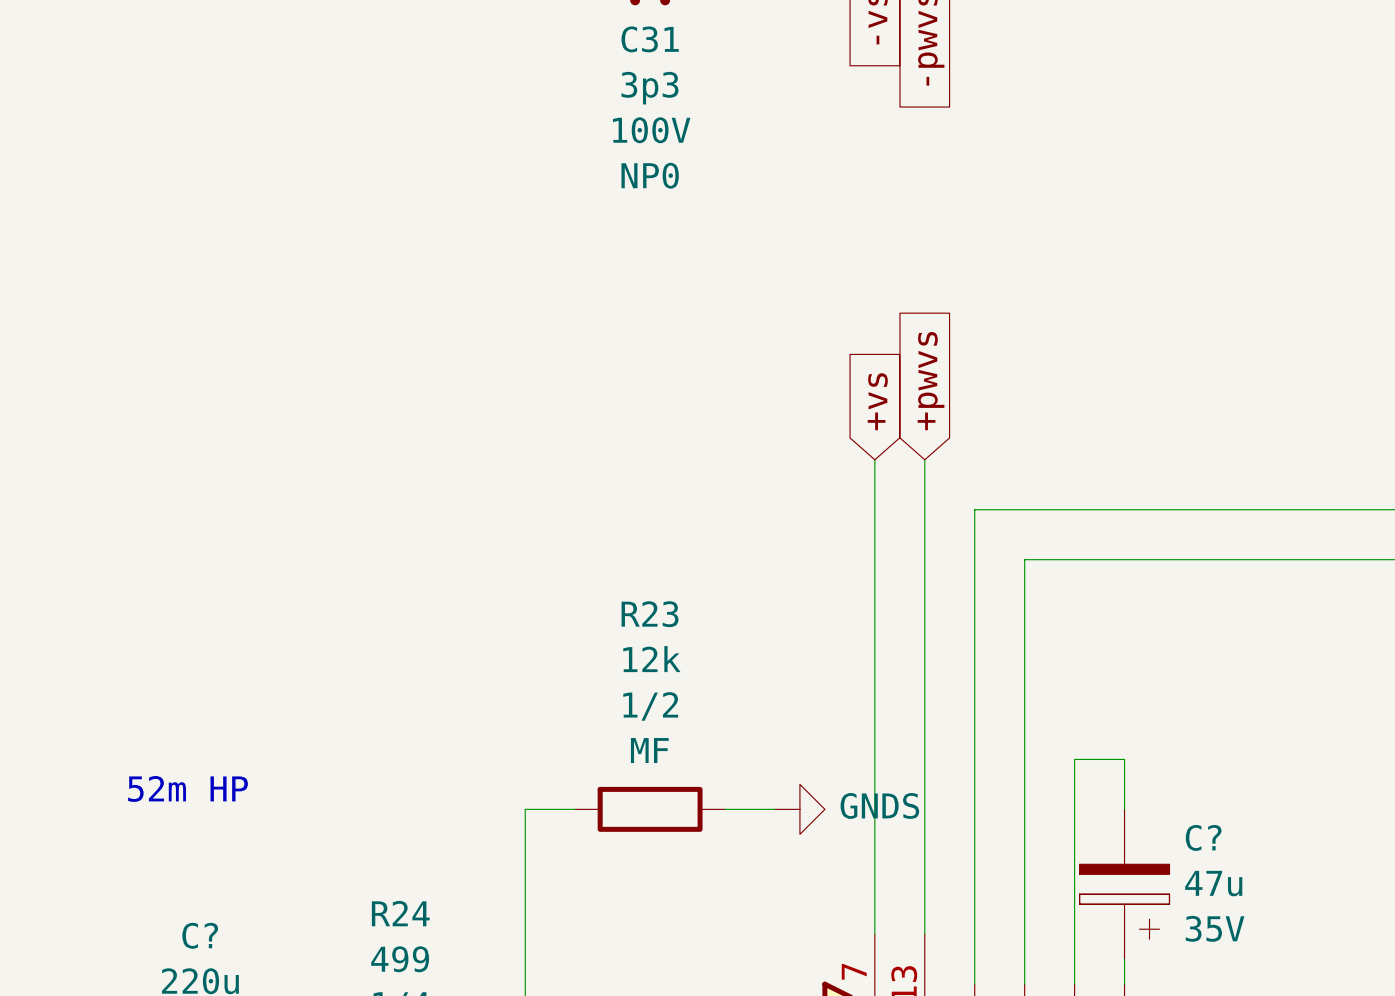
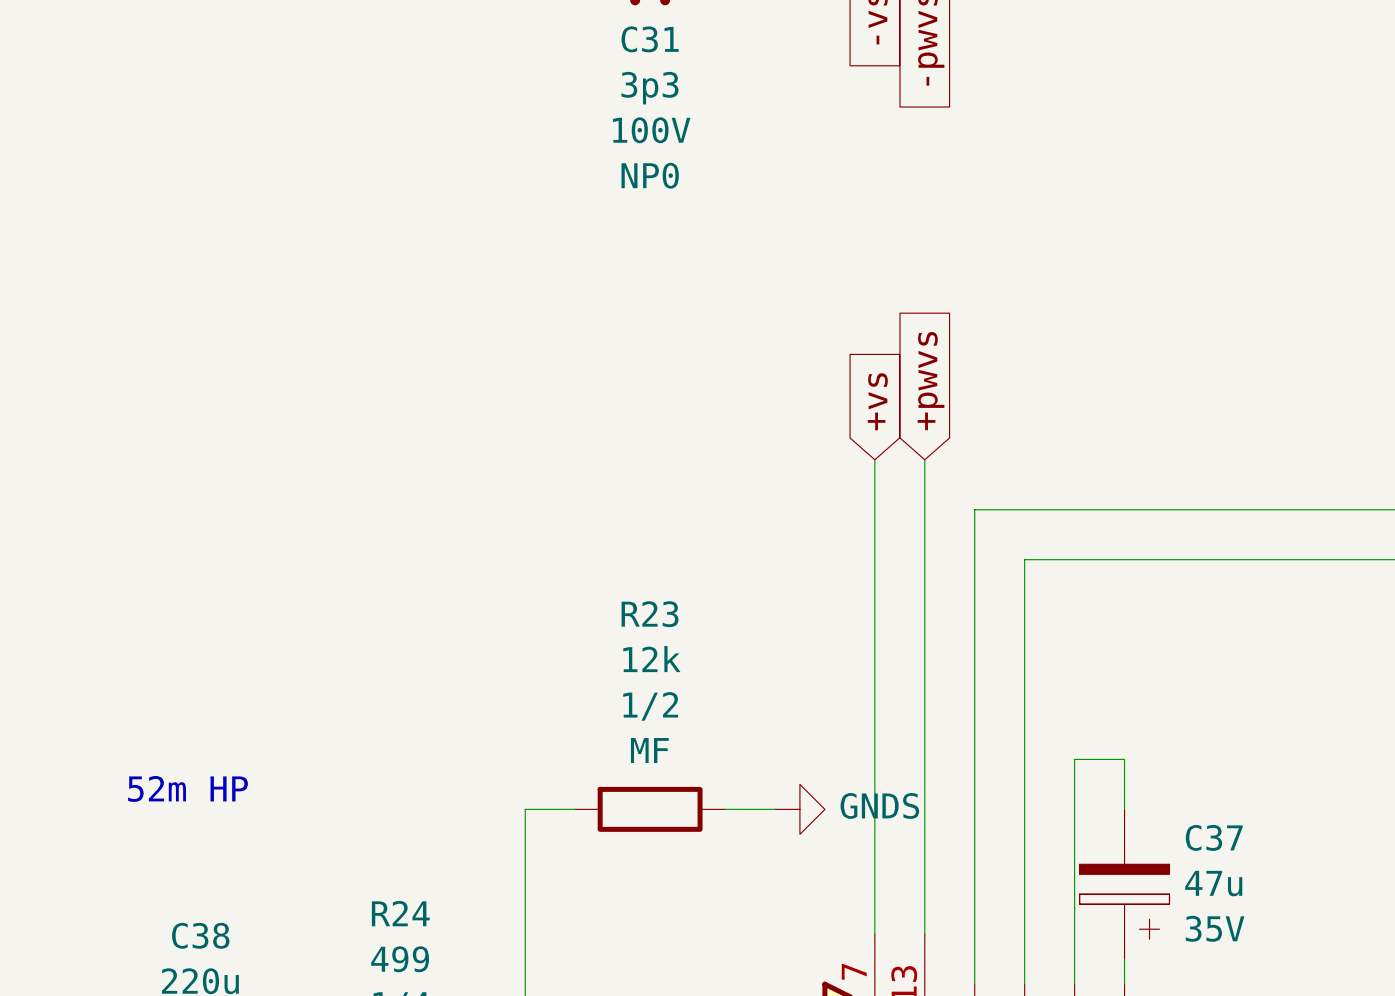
C? name: C? (1203, 837) -> C37 (1214, 837)
C? name: C? (200, 935) -> C38 (200, 935)

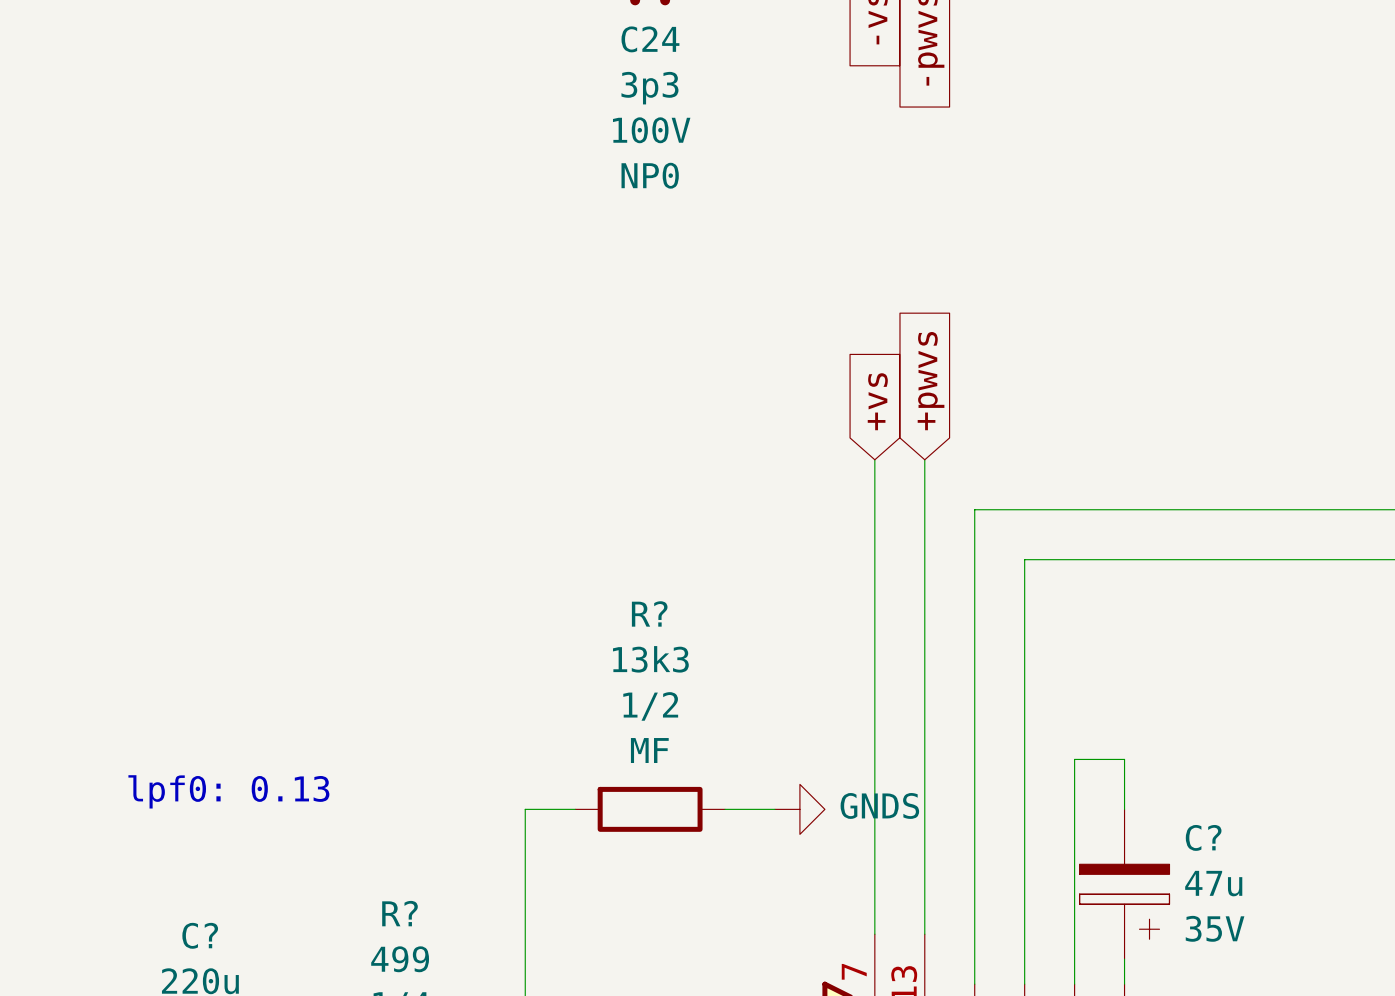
C31 name: C31 (650, 39) -> C24 (650, 39)
R23 name: R23 (650, 614) -> R? (649, 613)
R23 value: 12k (651, 659) -> 13k3 (650, 659)
text: 52m HP (188, 788) -> lpf0: 0.13 (228, 791)
C37 name: C37 (1214, 837) -> C? (1203, 837)
R24 name: R24 (400, 913) -> R? (400, 913)
C38 name: C38 (200, 935) -> C? (200, 935)

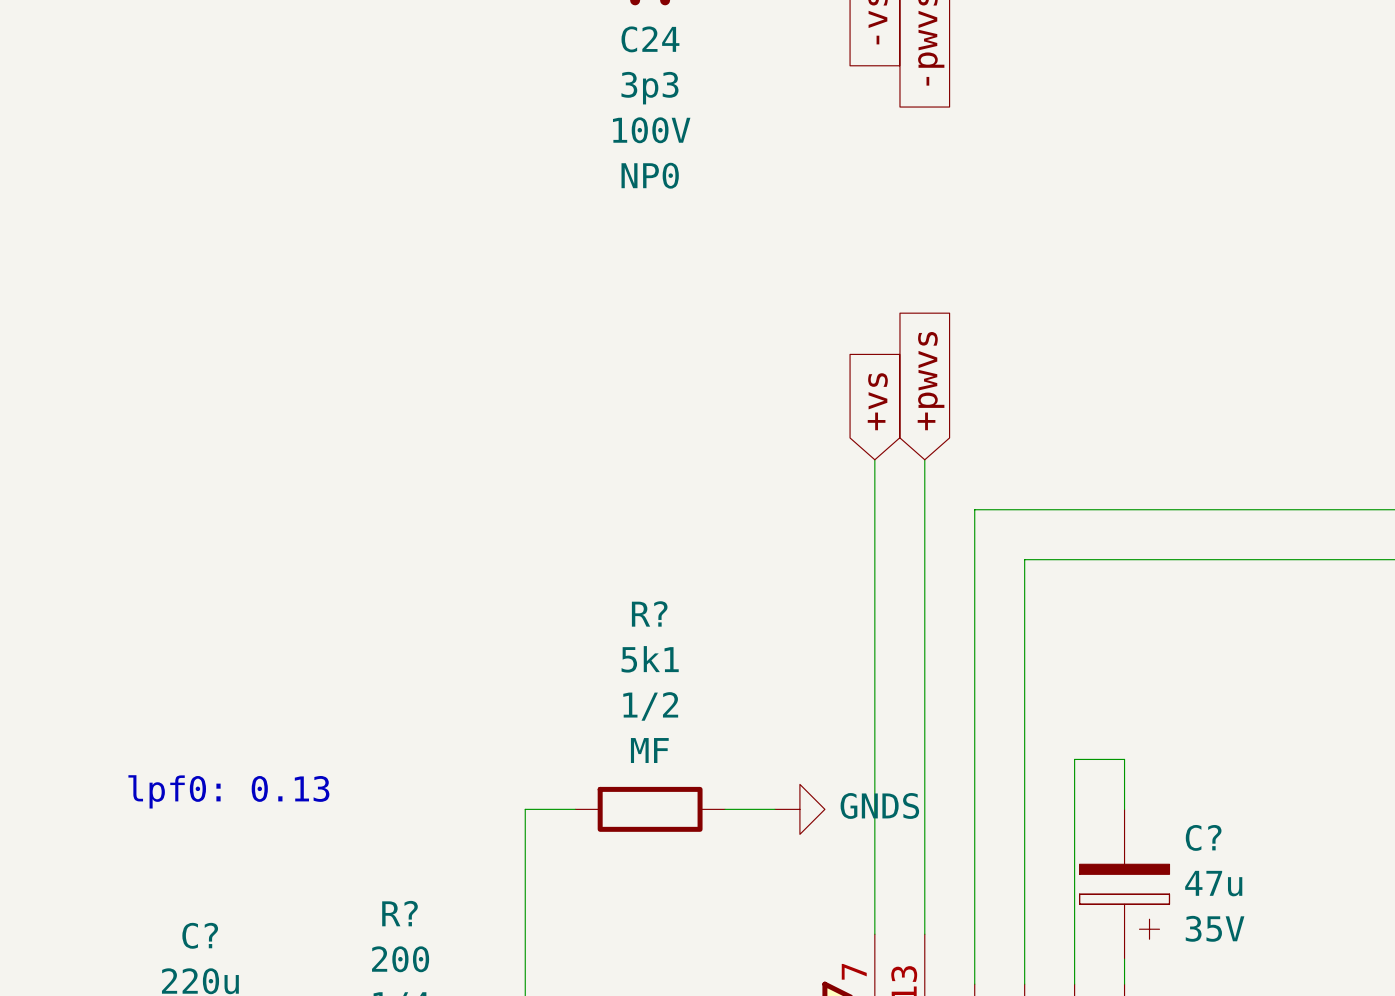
R? value: 13k3 (650, 659) -> 5k1 (650, 659)
R? value: 499 (400, 959) -> 200 (400, 959)

